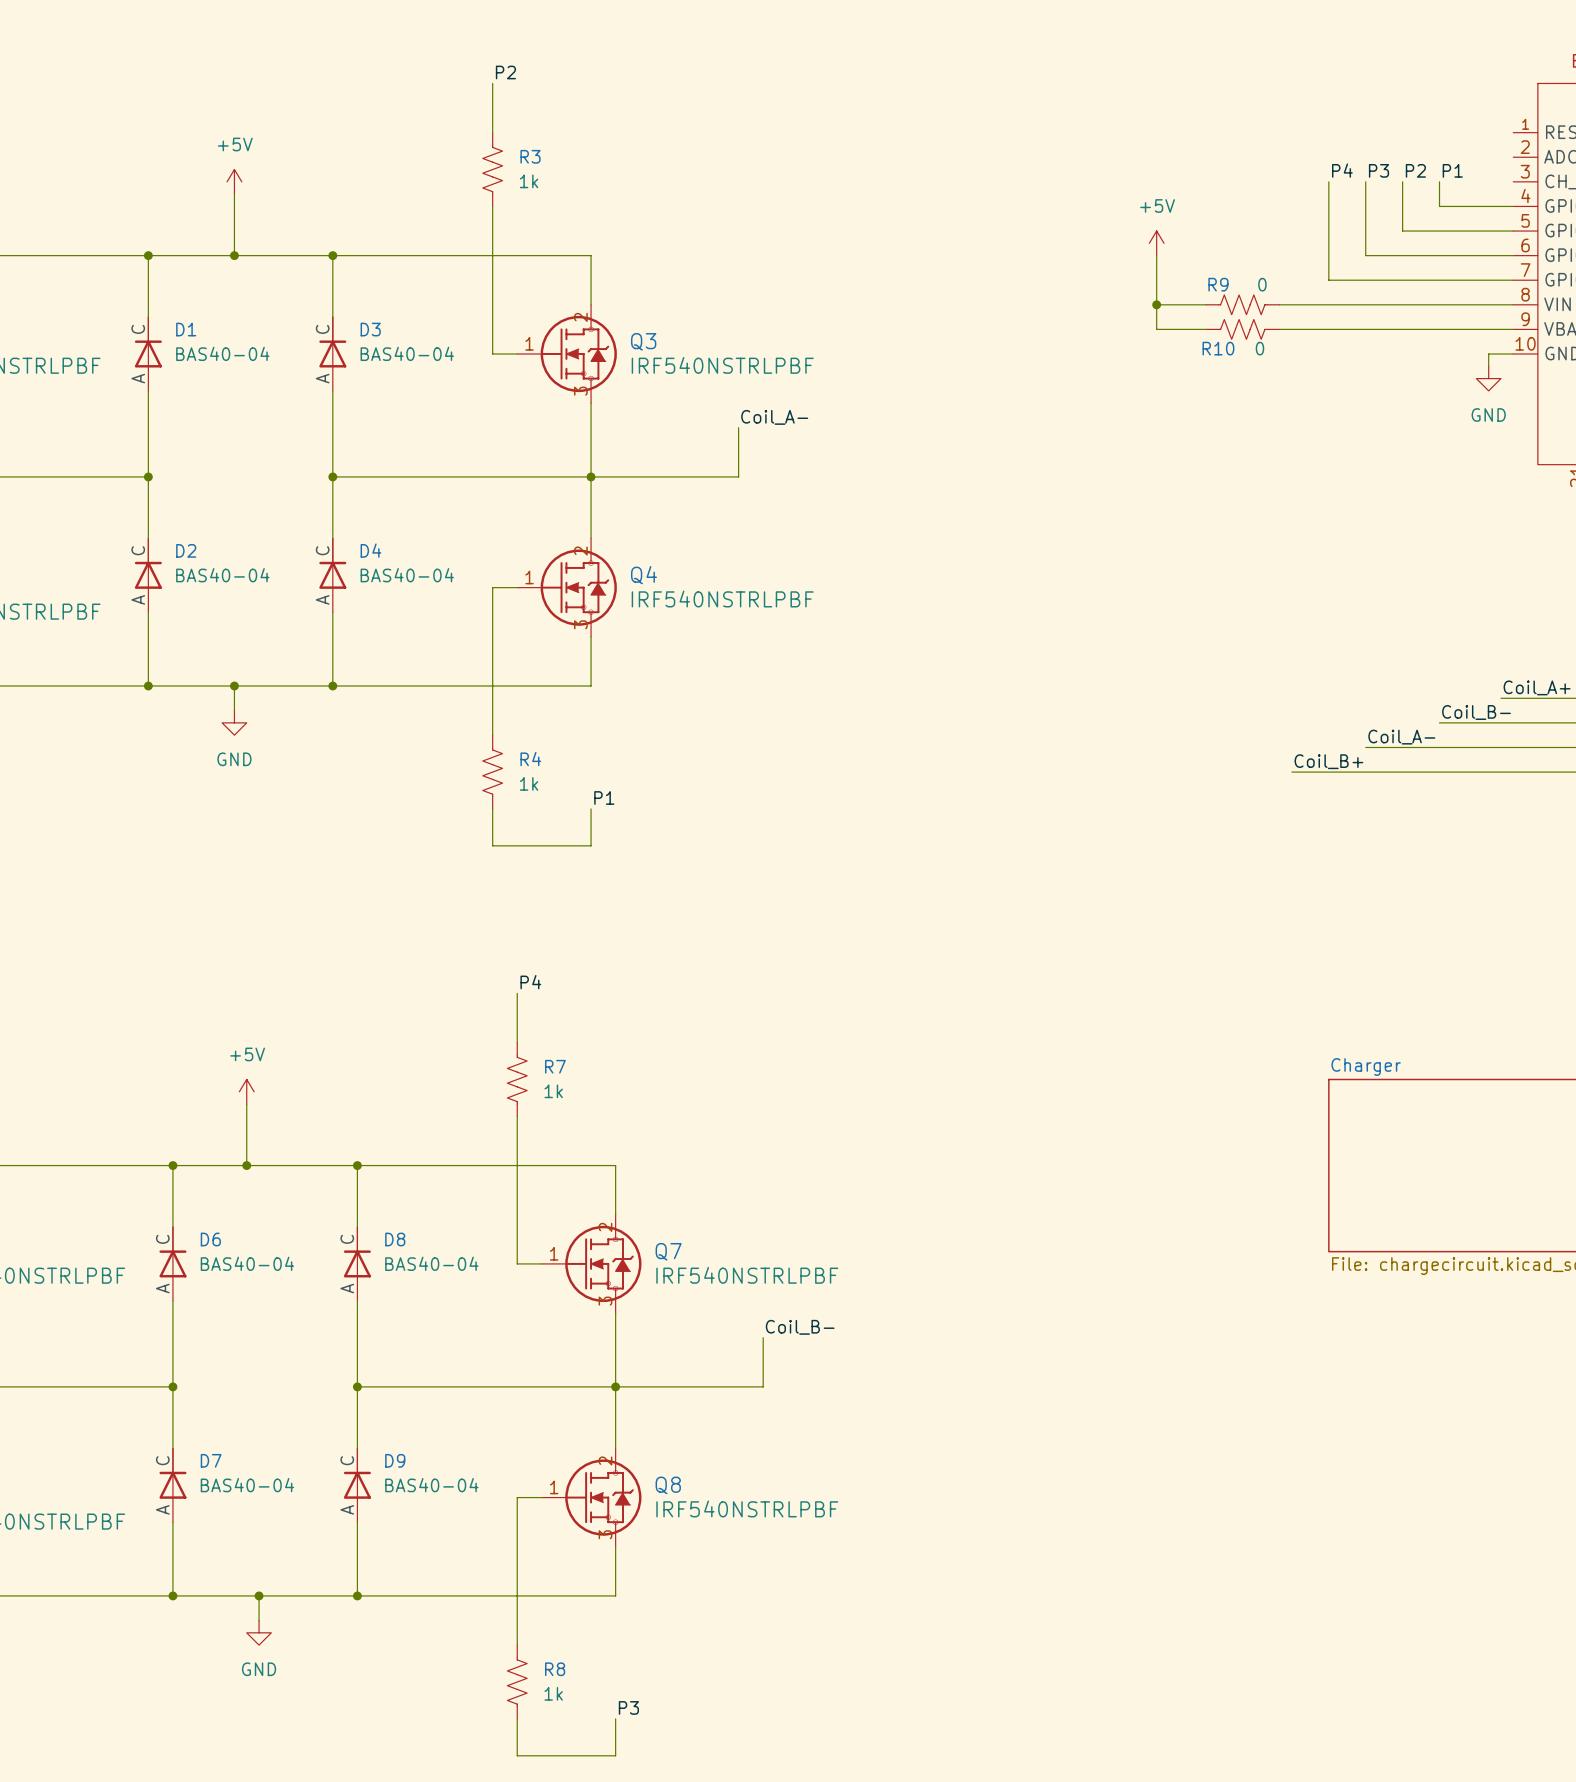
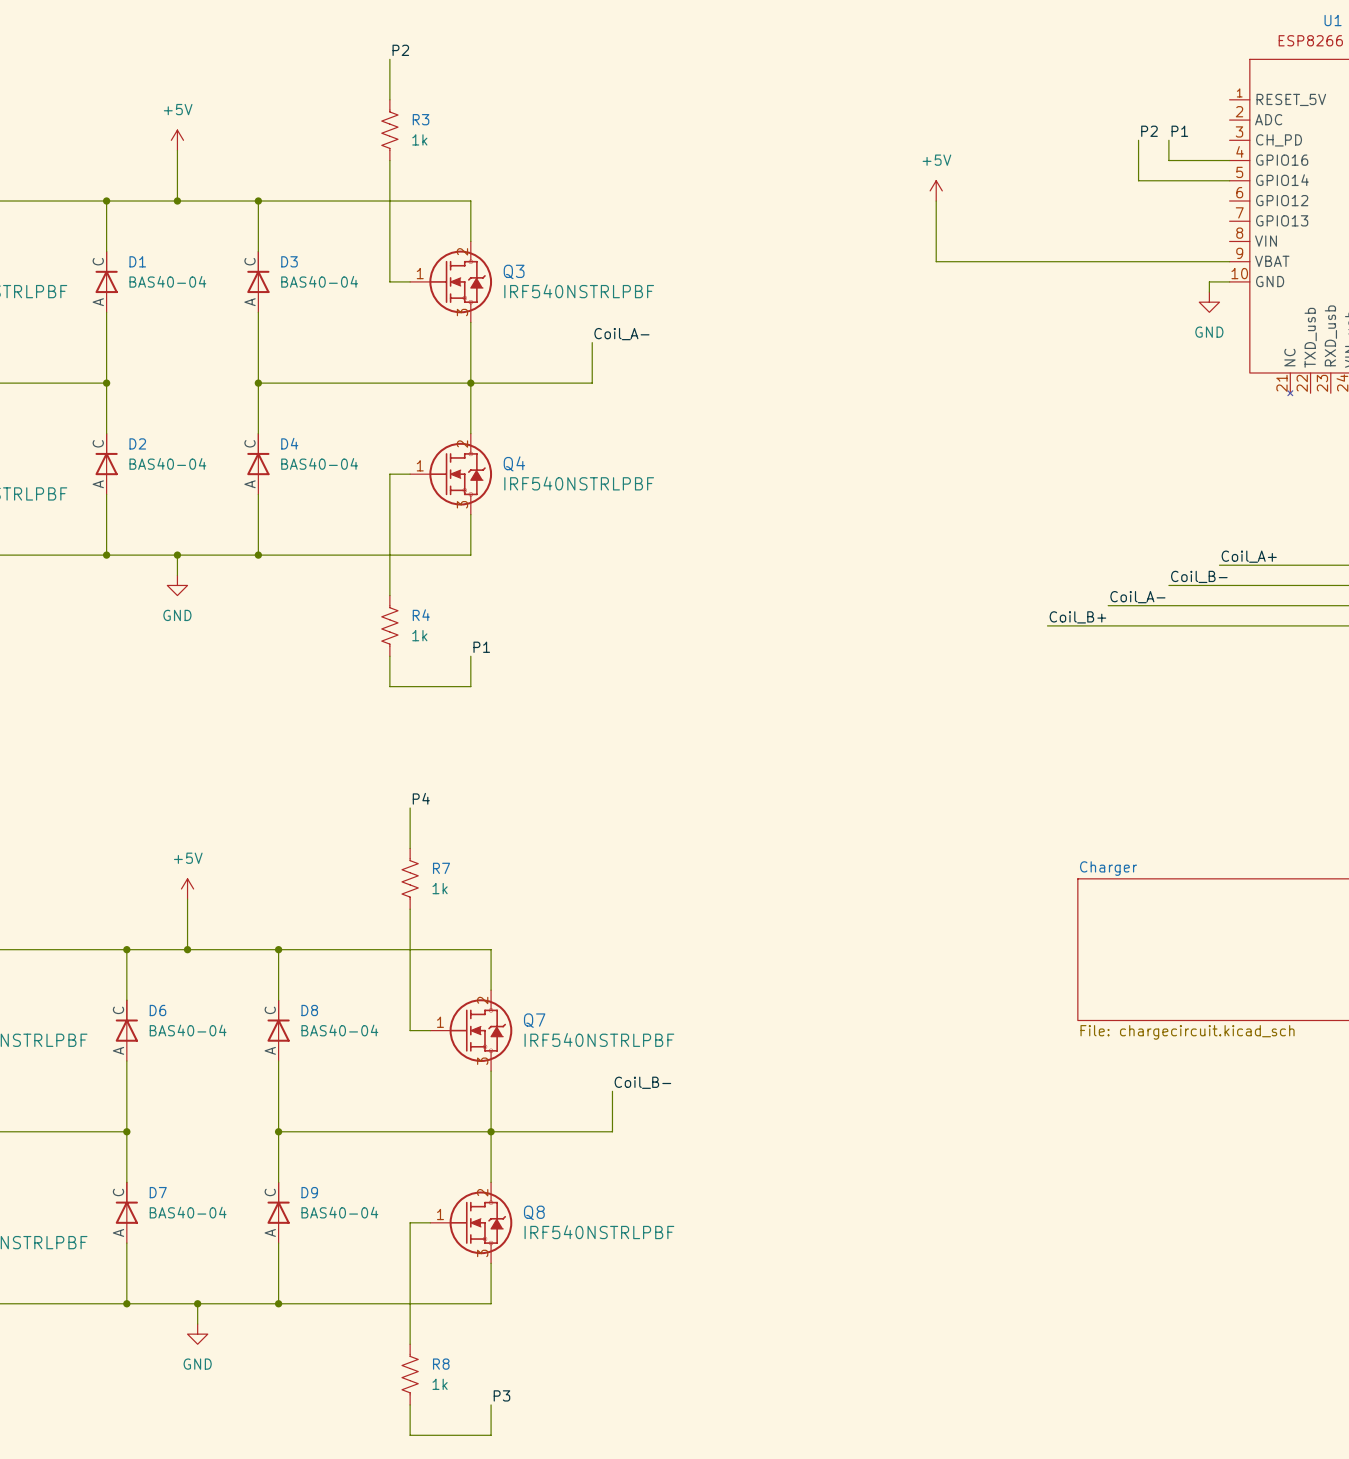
label: P4 (1342, 170) -> none
label: P3 (1378, 170) -> none
wire: (1328, 181) (1328, 280) (1513, 280) -> none
wire: (1365, 181) (1365, 255) (1513, 255) -> none
wire: (1156, 304) (1205, 304) -> none
junction: (1156, 304) -> none
R9: 0 (1242, 304) -> none
wire: (1279, 304) (1513, 304) -> none
R10: 0 (1242, 329) -> none

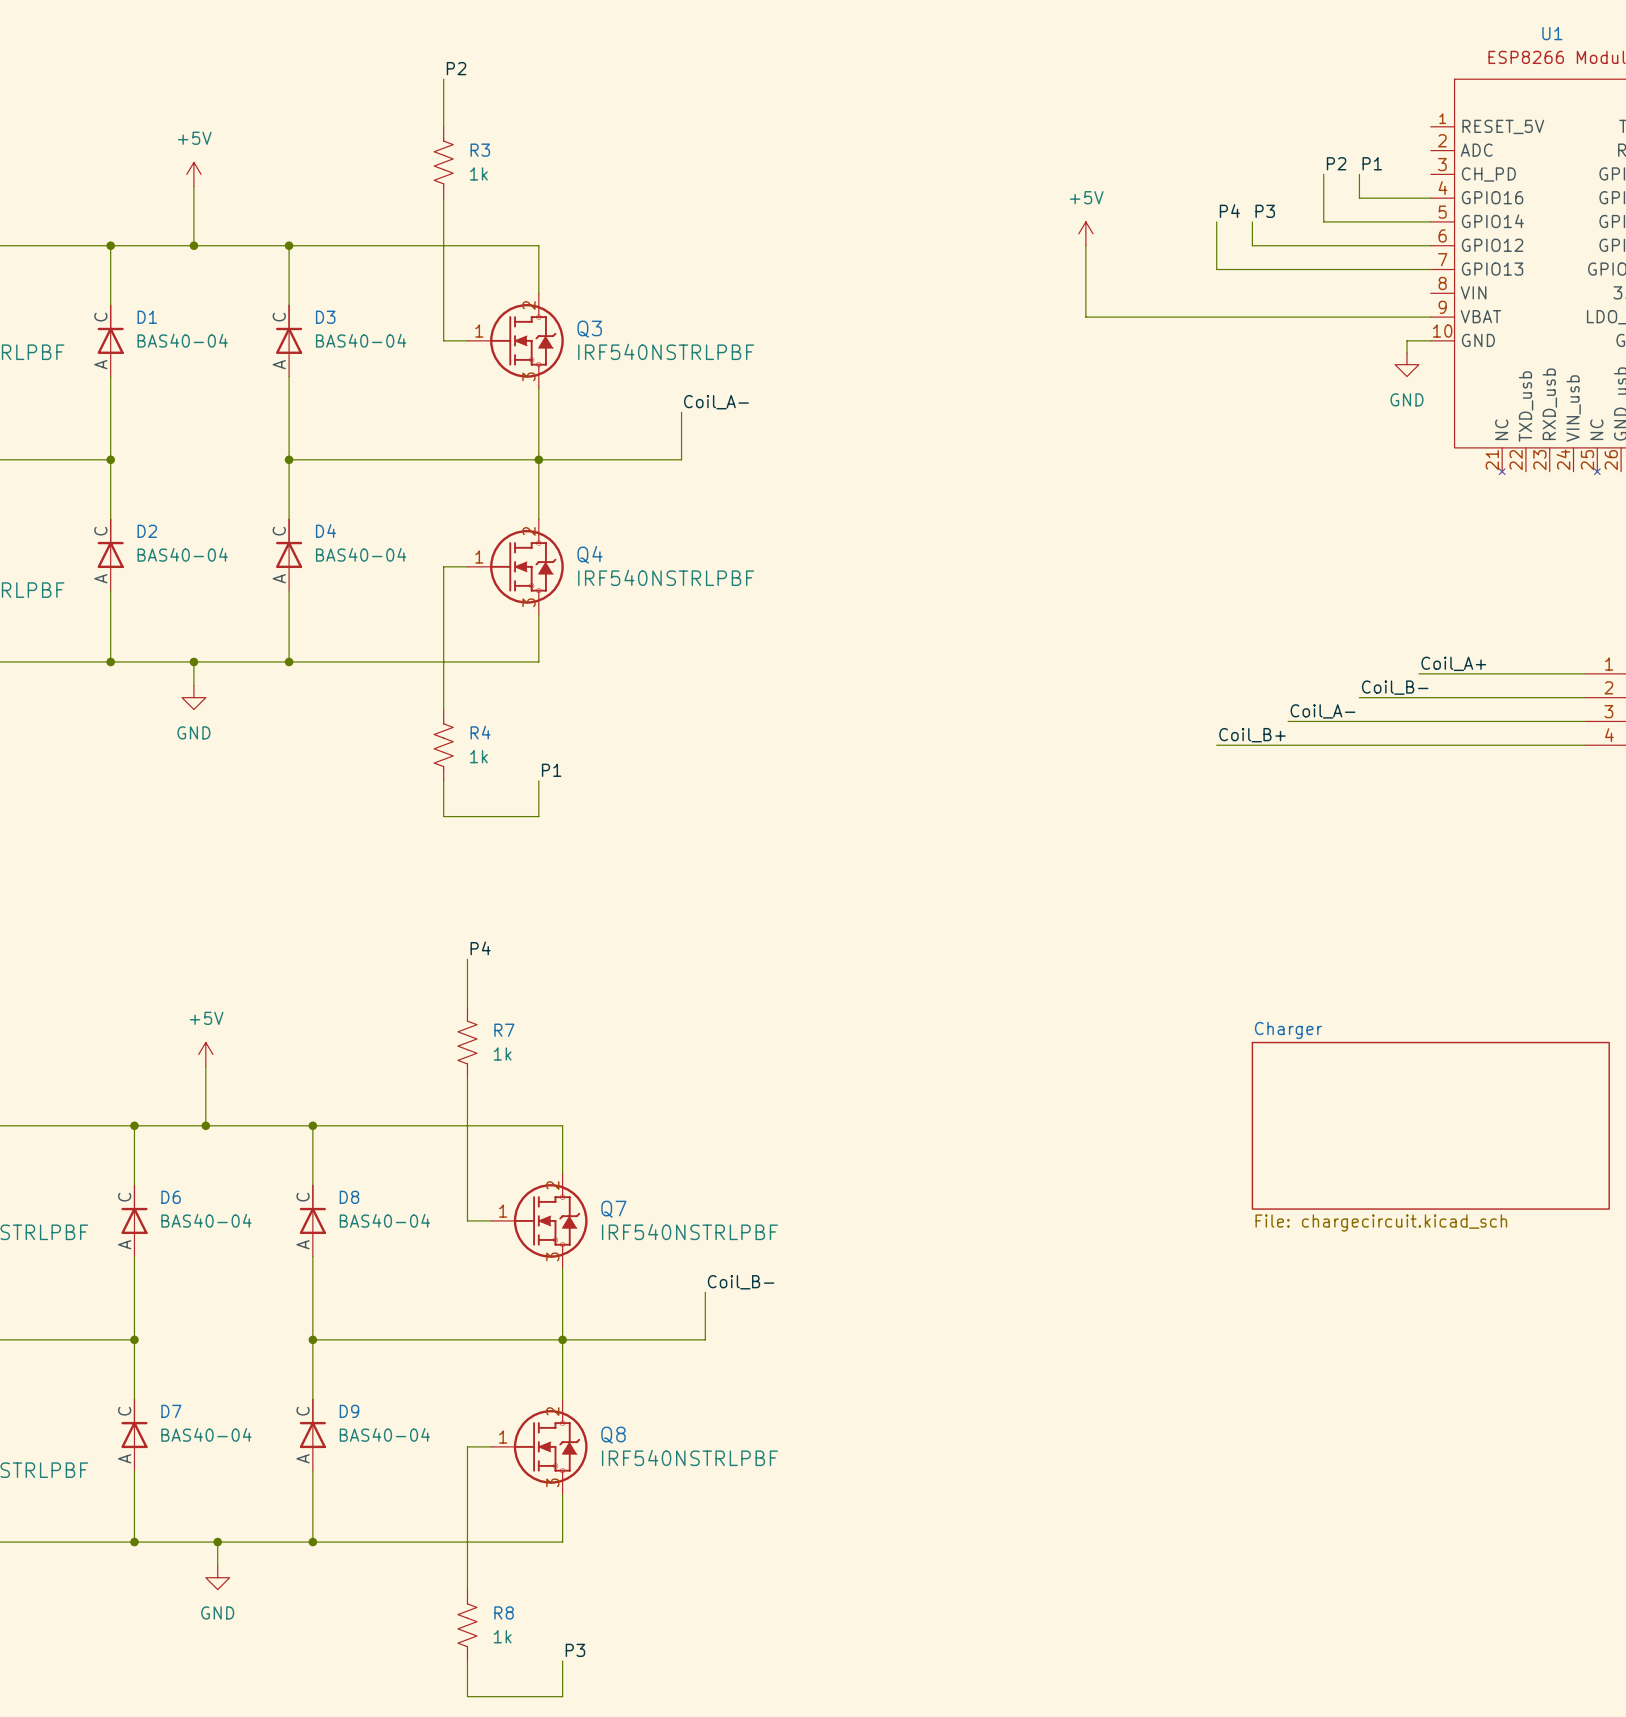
label: none -> P4 (1229, 211)
label: none -> P3 (1265, 211)
wire: none -> (1216, 221) (1216, 269) (1430, 269)
wire: none -> (1252, 221) (1252, 245) (1430, 245)

